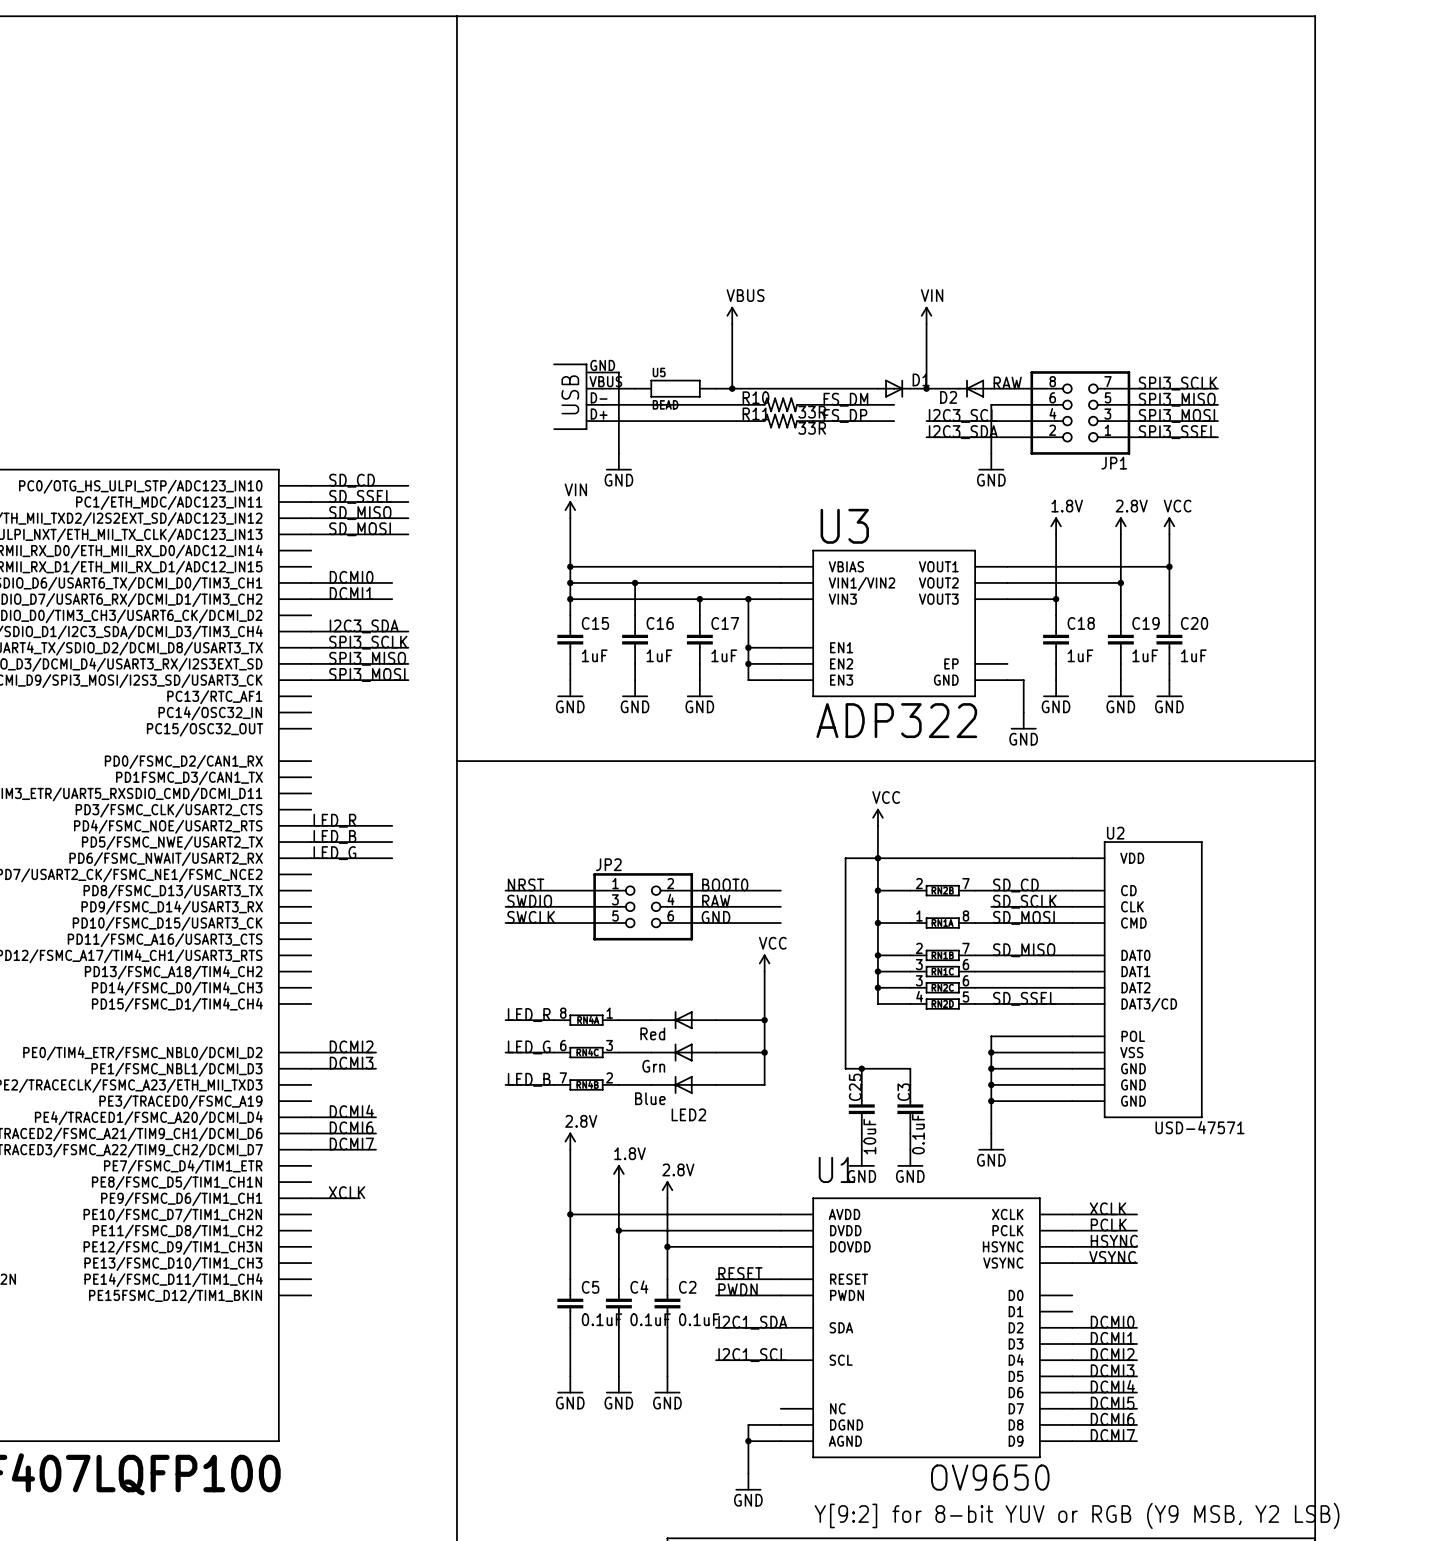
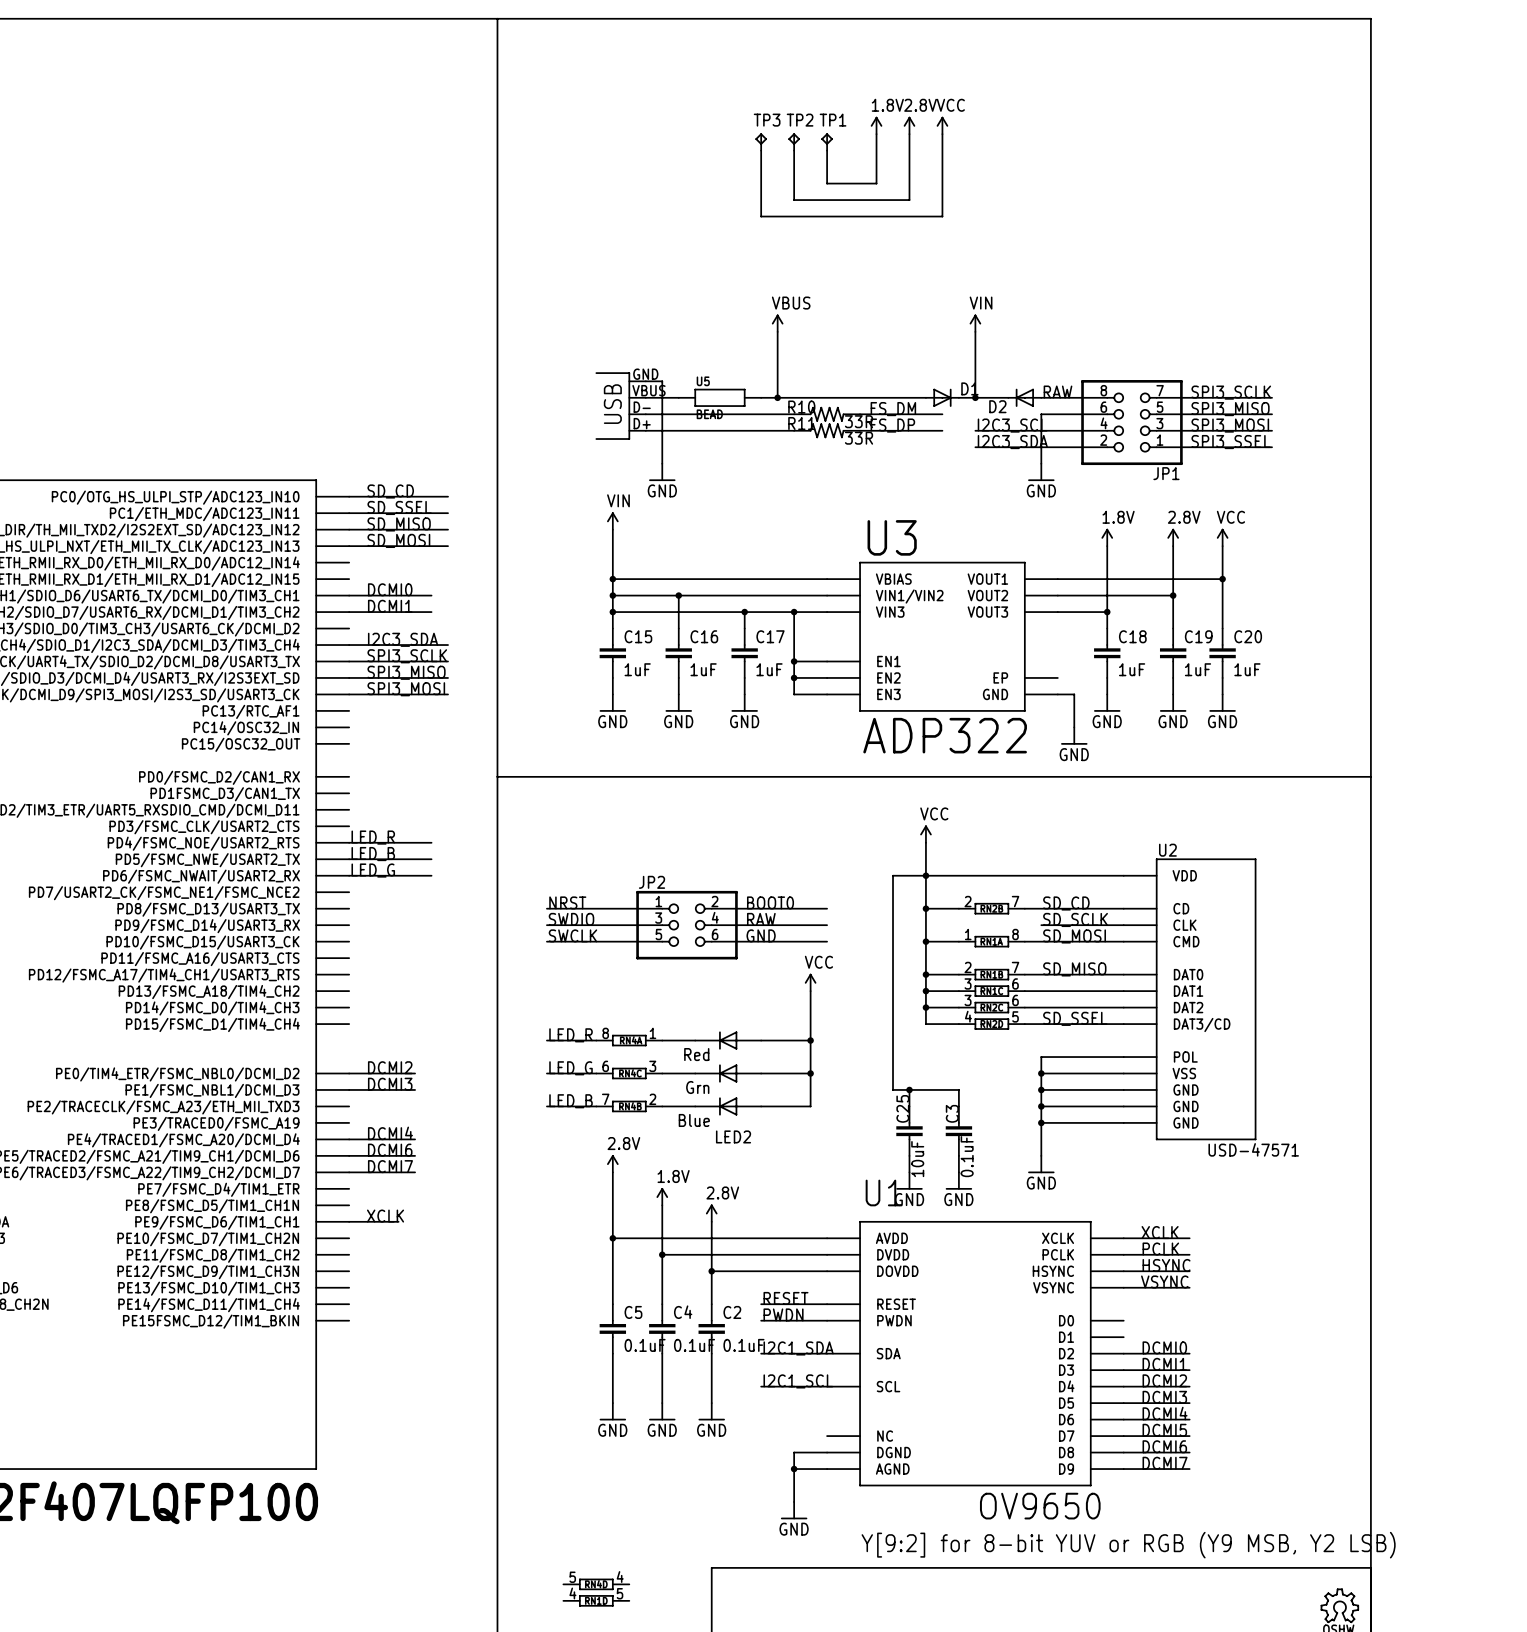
power symbol: none -> 1.8V (876, 125)
power symbol: none -> 2.8V (909, 125)
power symbol: none -> VCC (942, 125)
wire: none -> (876, 134) (876, 183) (827, 183) (827, 150)
wire: none -> (909, 134) (909, 200) (794, 200) (794, 150)
wire: none -> (942, 134) (942, 216) (761, 216) (761, 150)
TP3: none -> (761, 141)
TP2: none -> (794, 141)
TP1: none -> (827, 141)

